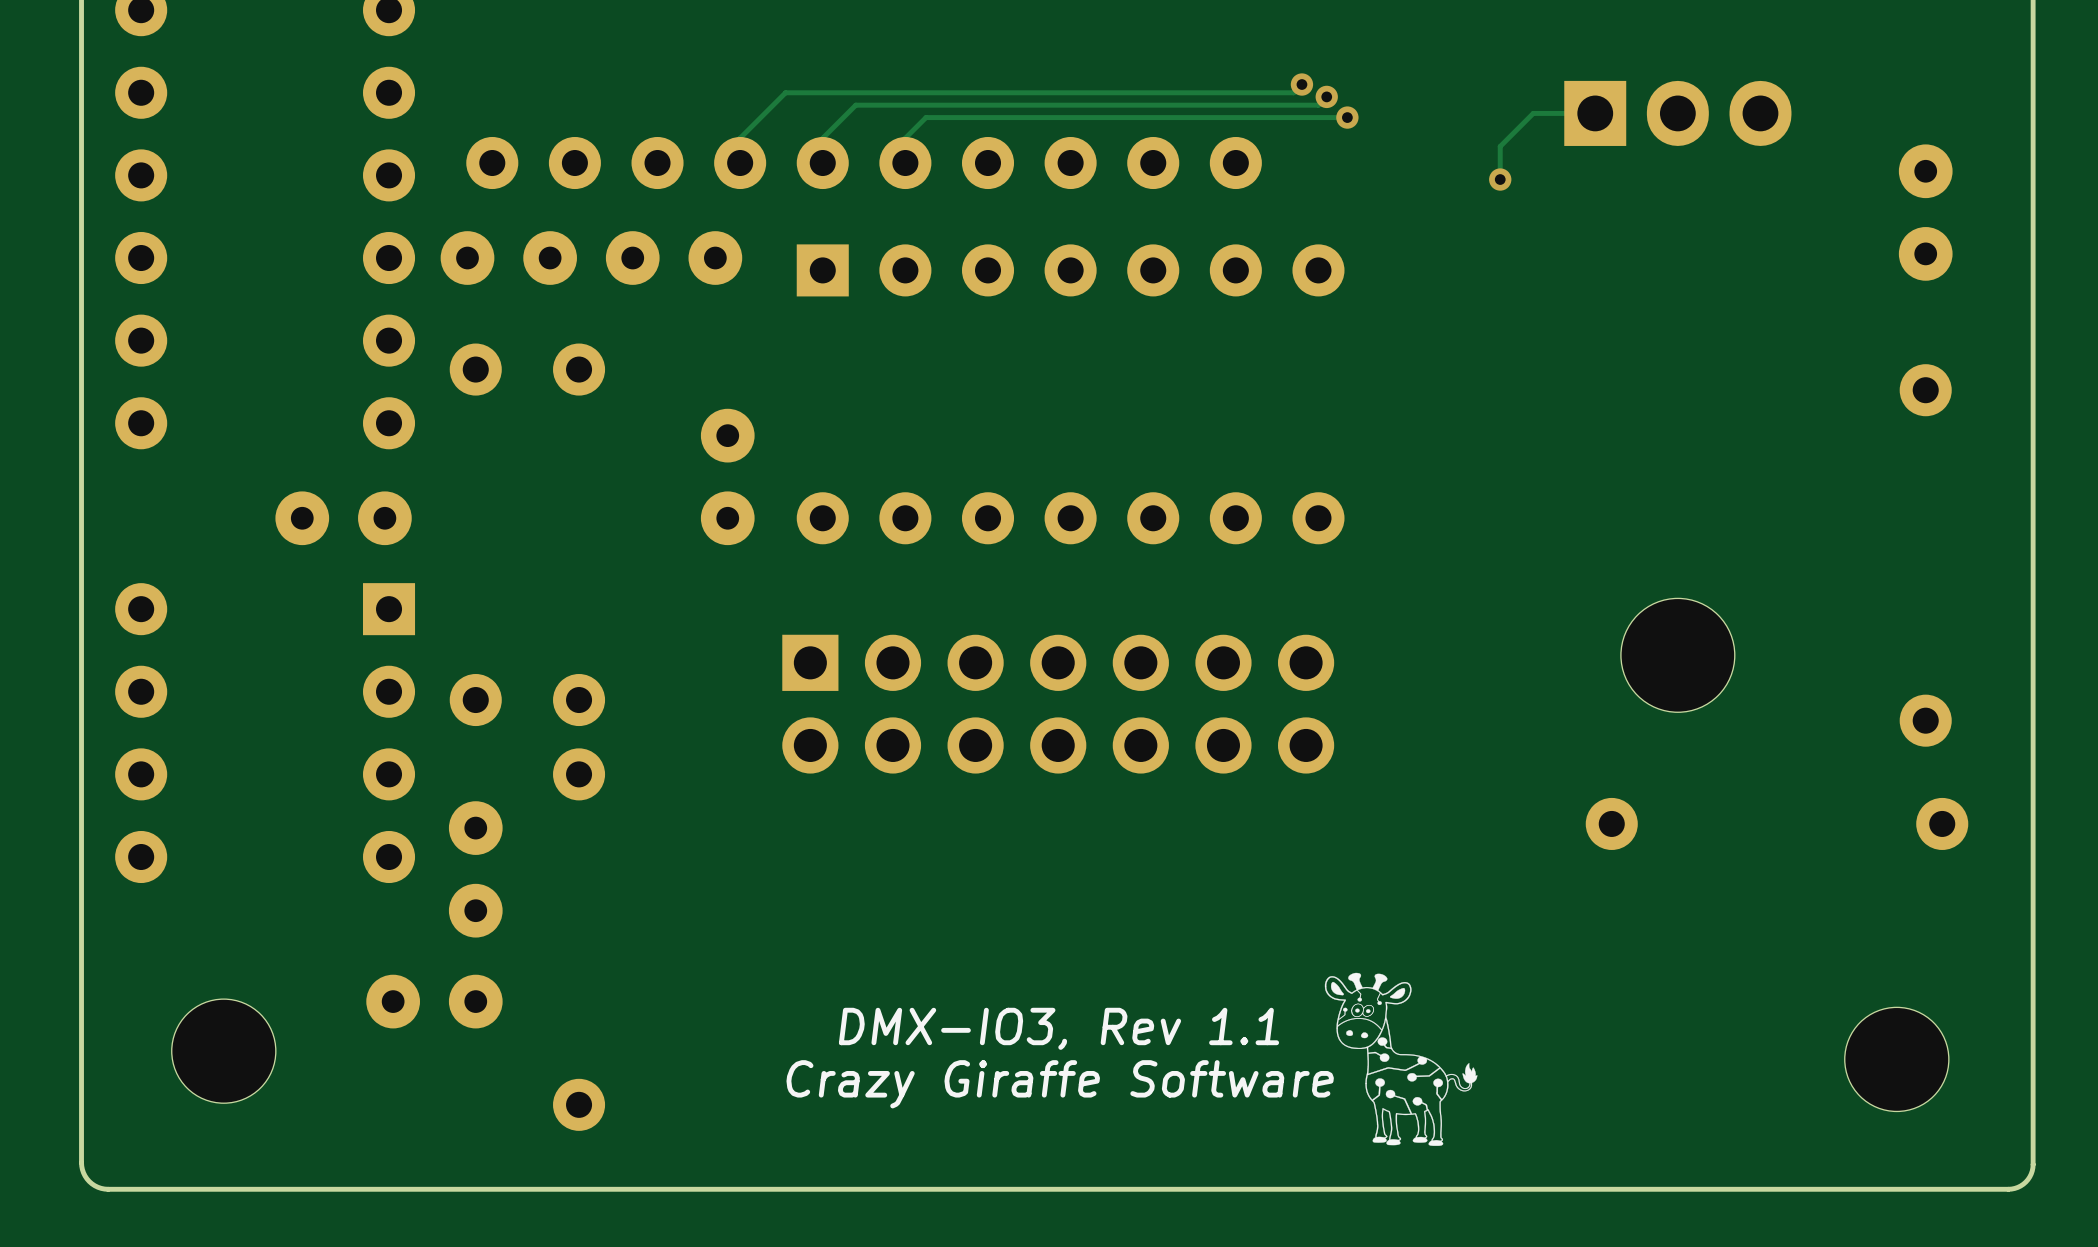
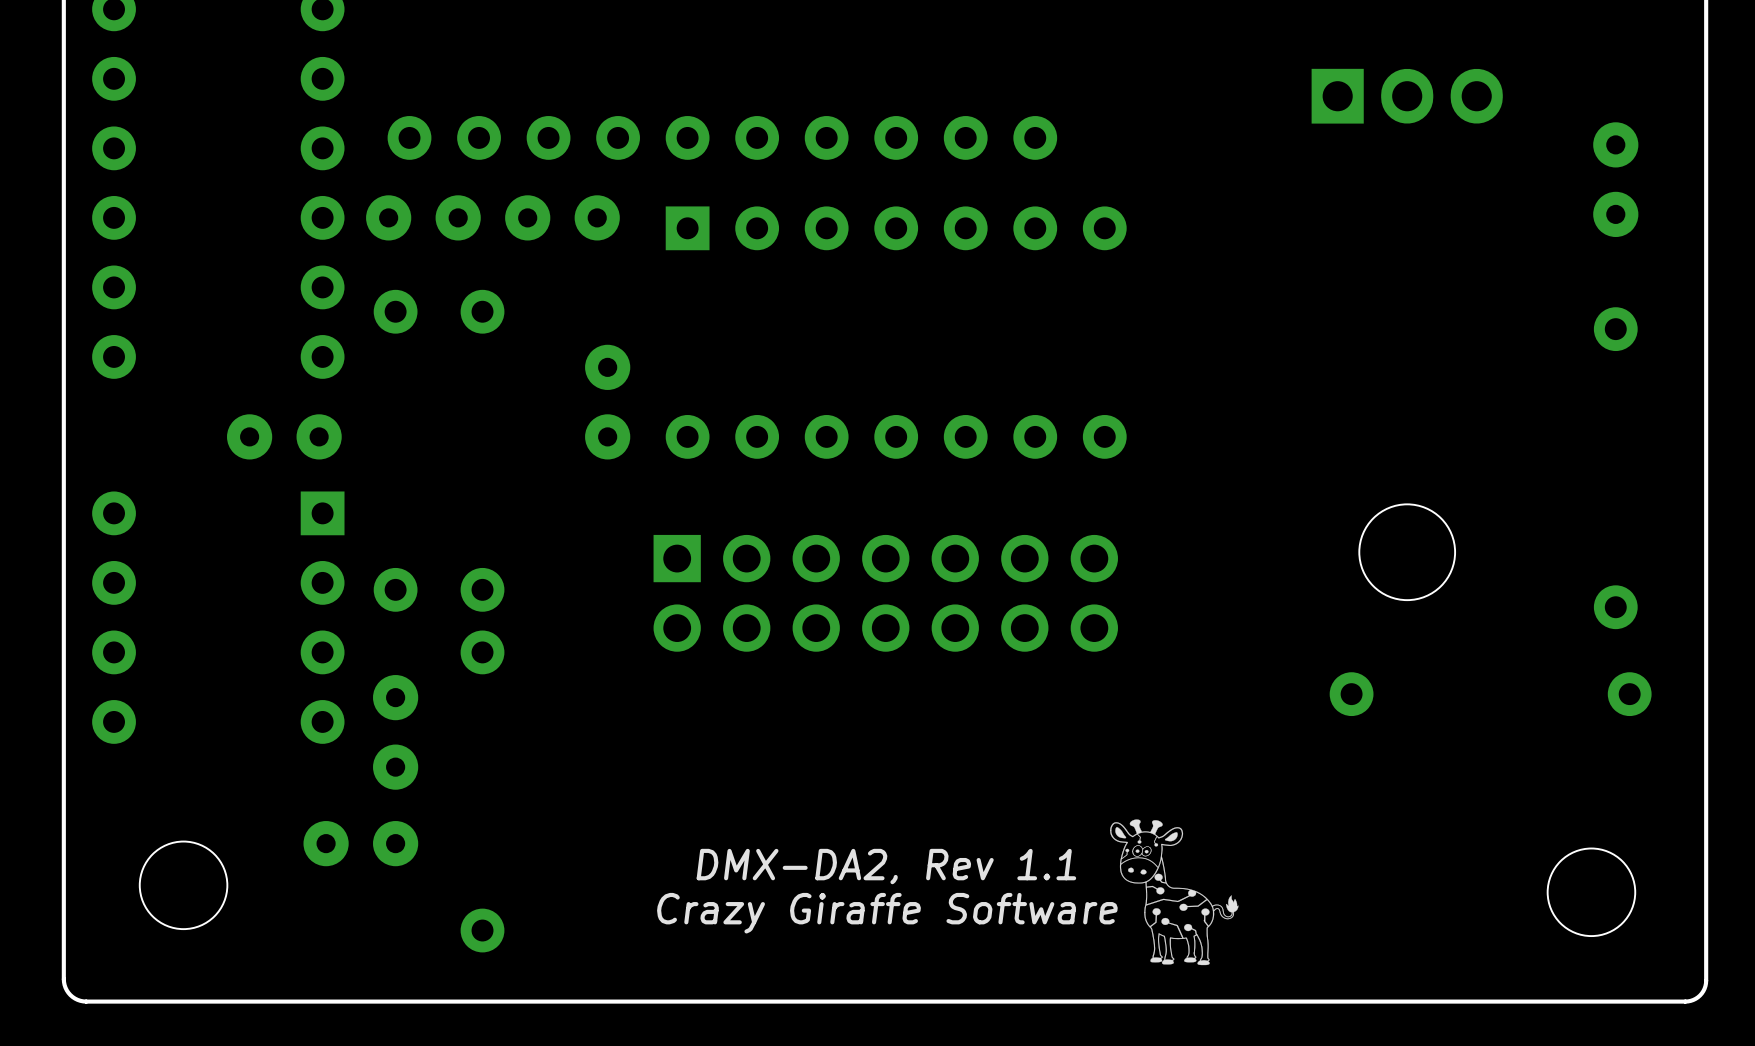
track: (1301, 84) (1293, 92) (785, 92) (740, 138) (740, 163) -> none
via: (1301, 84) -> none
track: (1326, 96) (1318, 105) (855, 105) (822, 138) (822, 163) -> none
via: (1326, 96) -> none
track: (1595, 113) (1533, 113) (1500, 146) (1500, 179) -> none
track: (1347, 117) (926, 117) (905, 138) (905, 163) -> none
via: (1347, 117) -> none
via: (1500, 179) -> none
text: DMX-IO3, Rev 1.1 (1059, 1028) -> DMX-DA2, Rev 1.1 (886, 866)

